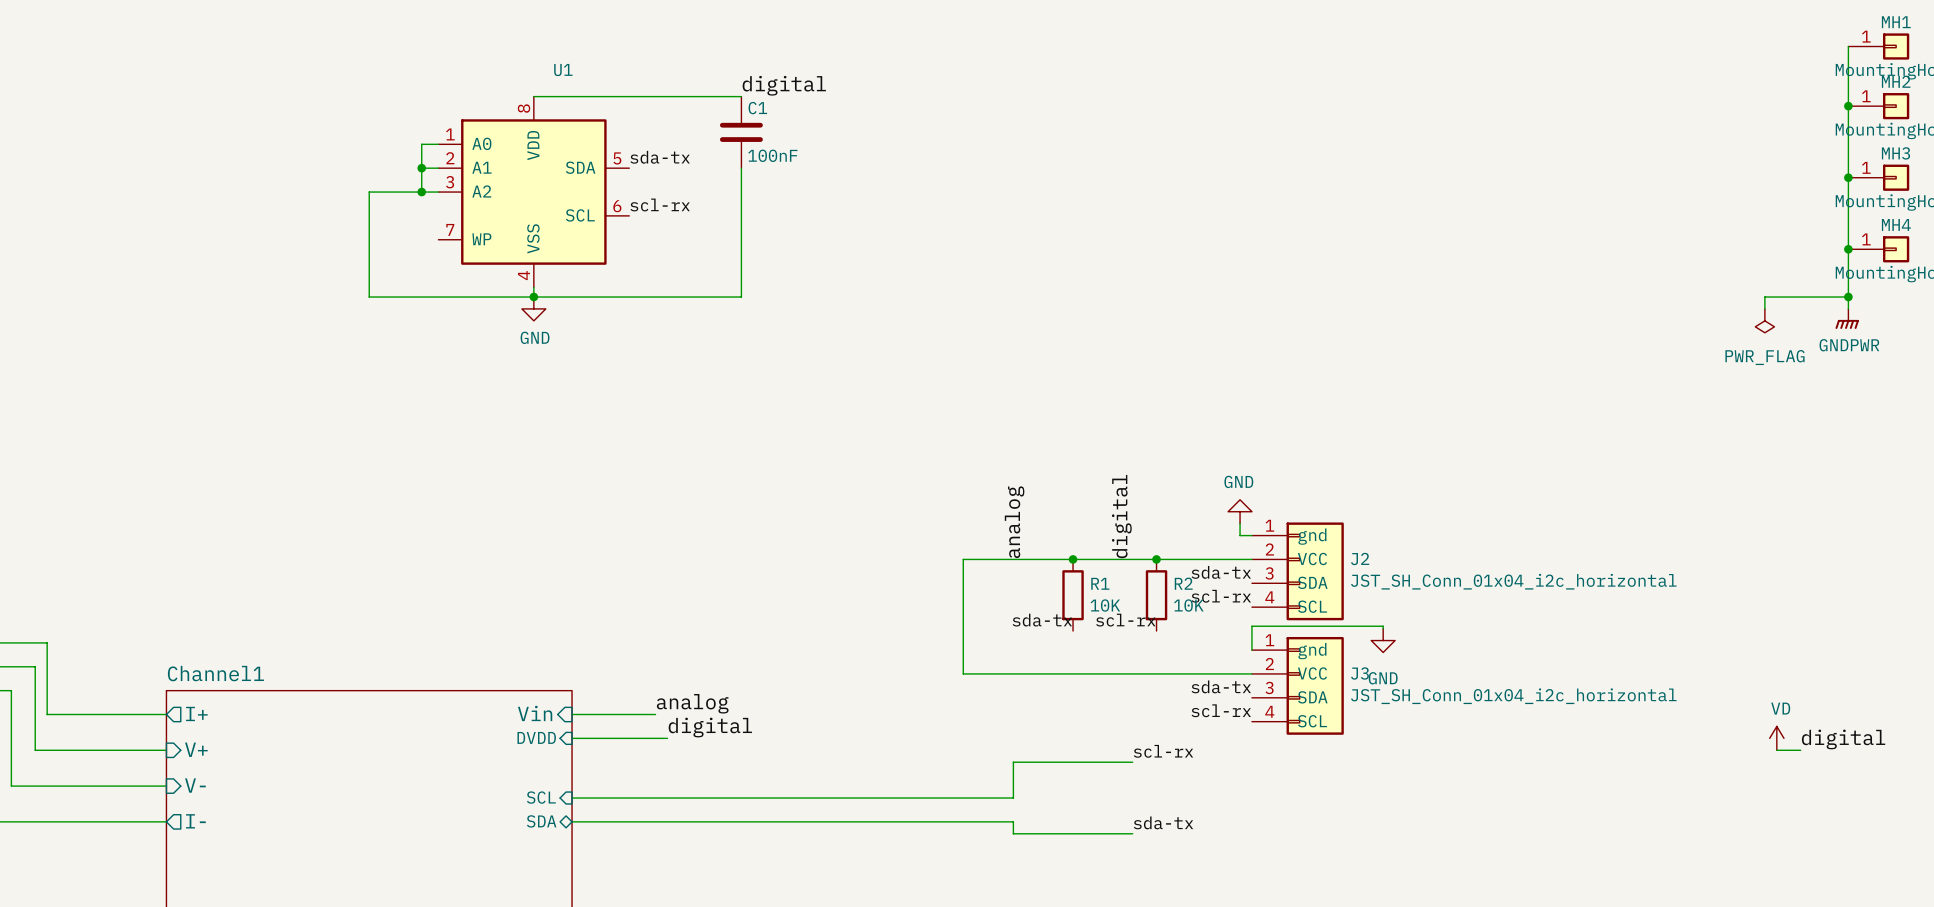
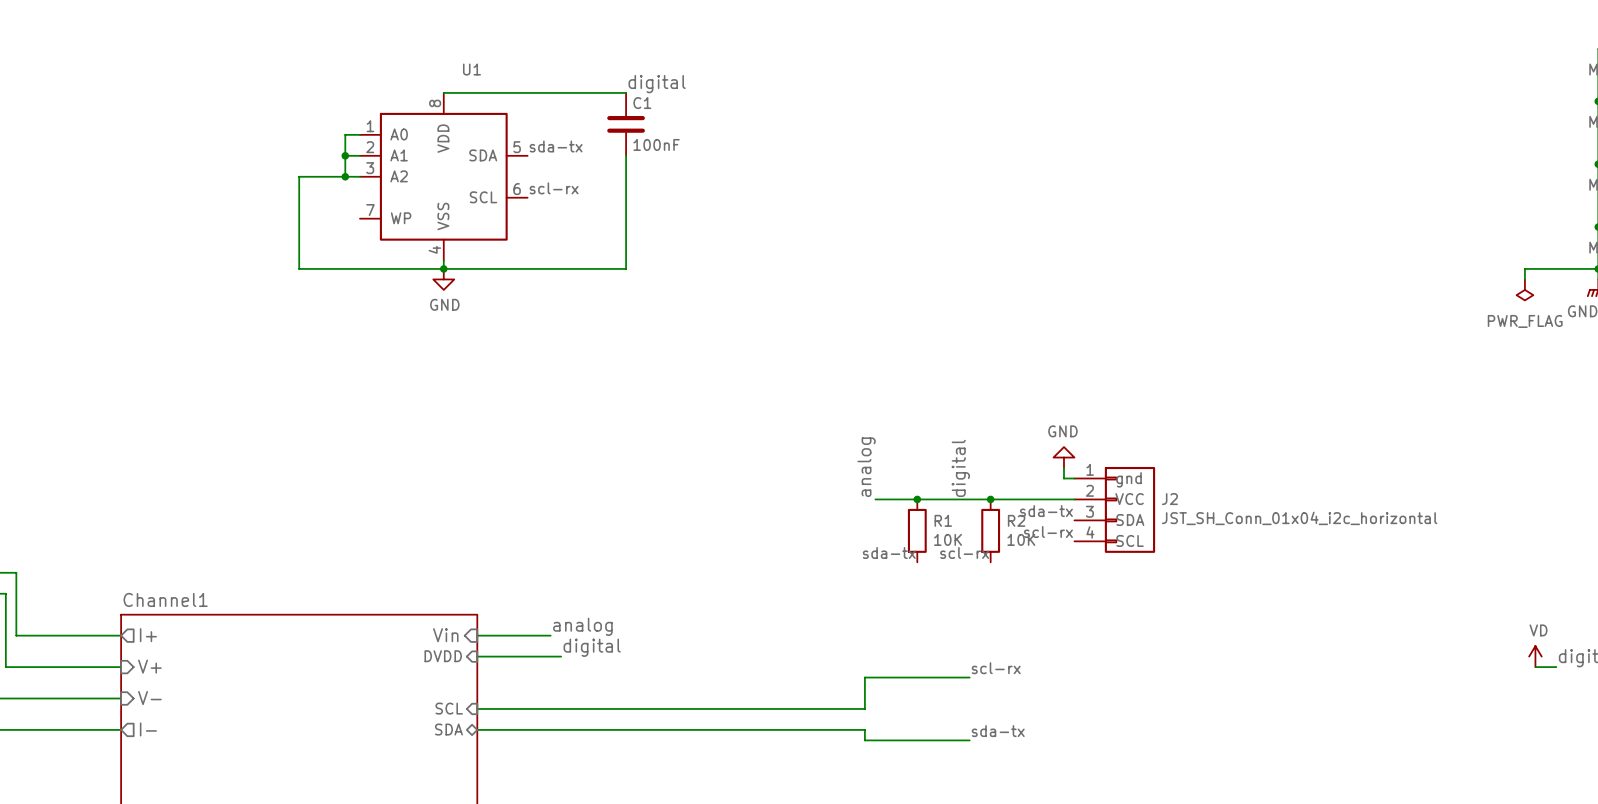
wire: (1025, 559) (963, 559) (963, 673) (1251, 673) -> none
wire: (1383, 628) (1383, 626) (1251, 626) (1251, 650) -> none
power symbol: GND (1383, 640) -> none
J3: JST_SH_Conn_01x04_i2c_horizontal (1297, 685) -> none
label: sda-tx (1221, 686) -> none
label: scl-rx (1221, 710) -> none

